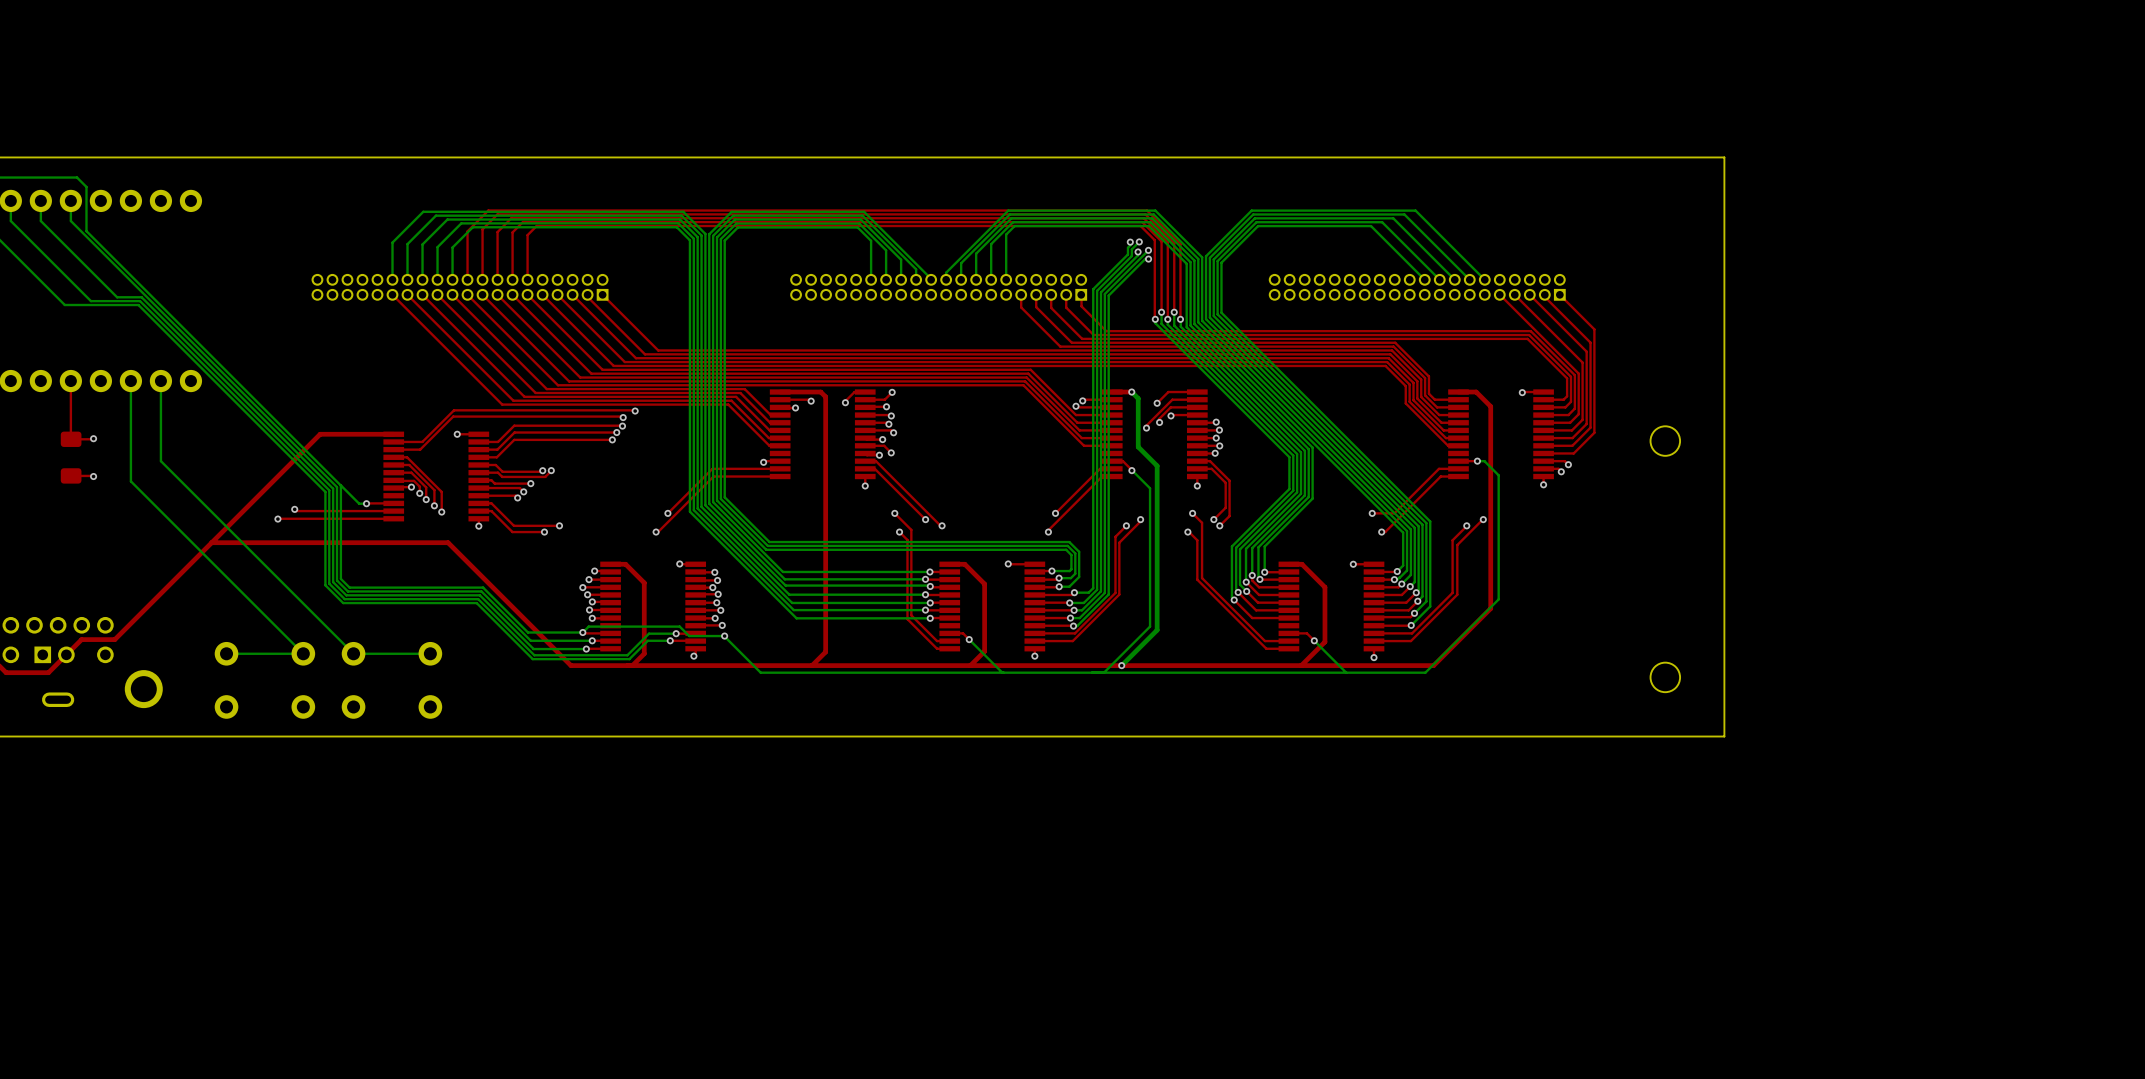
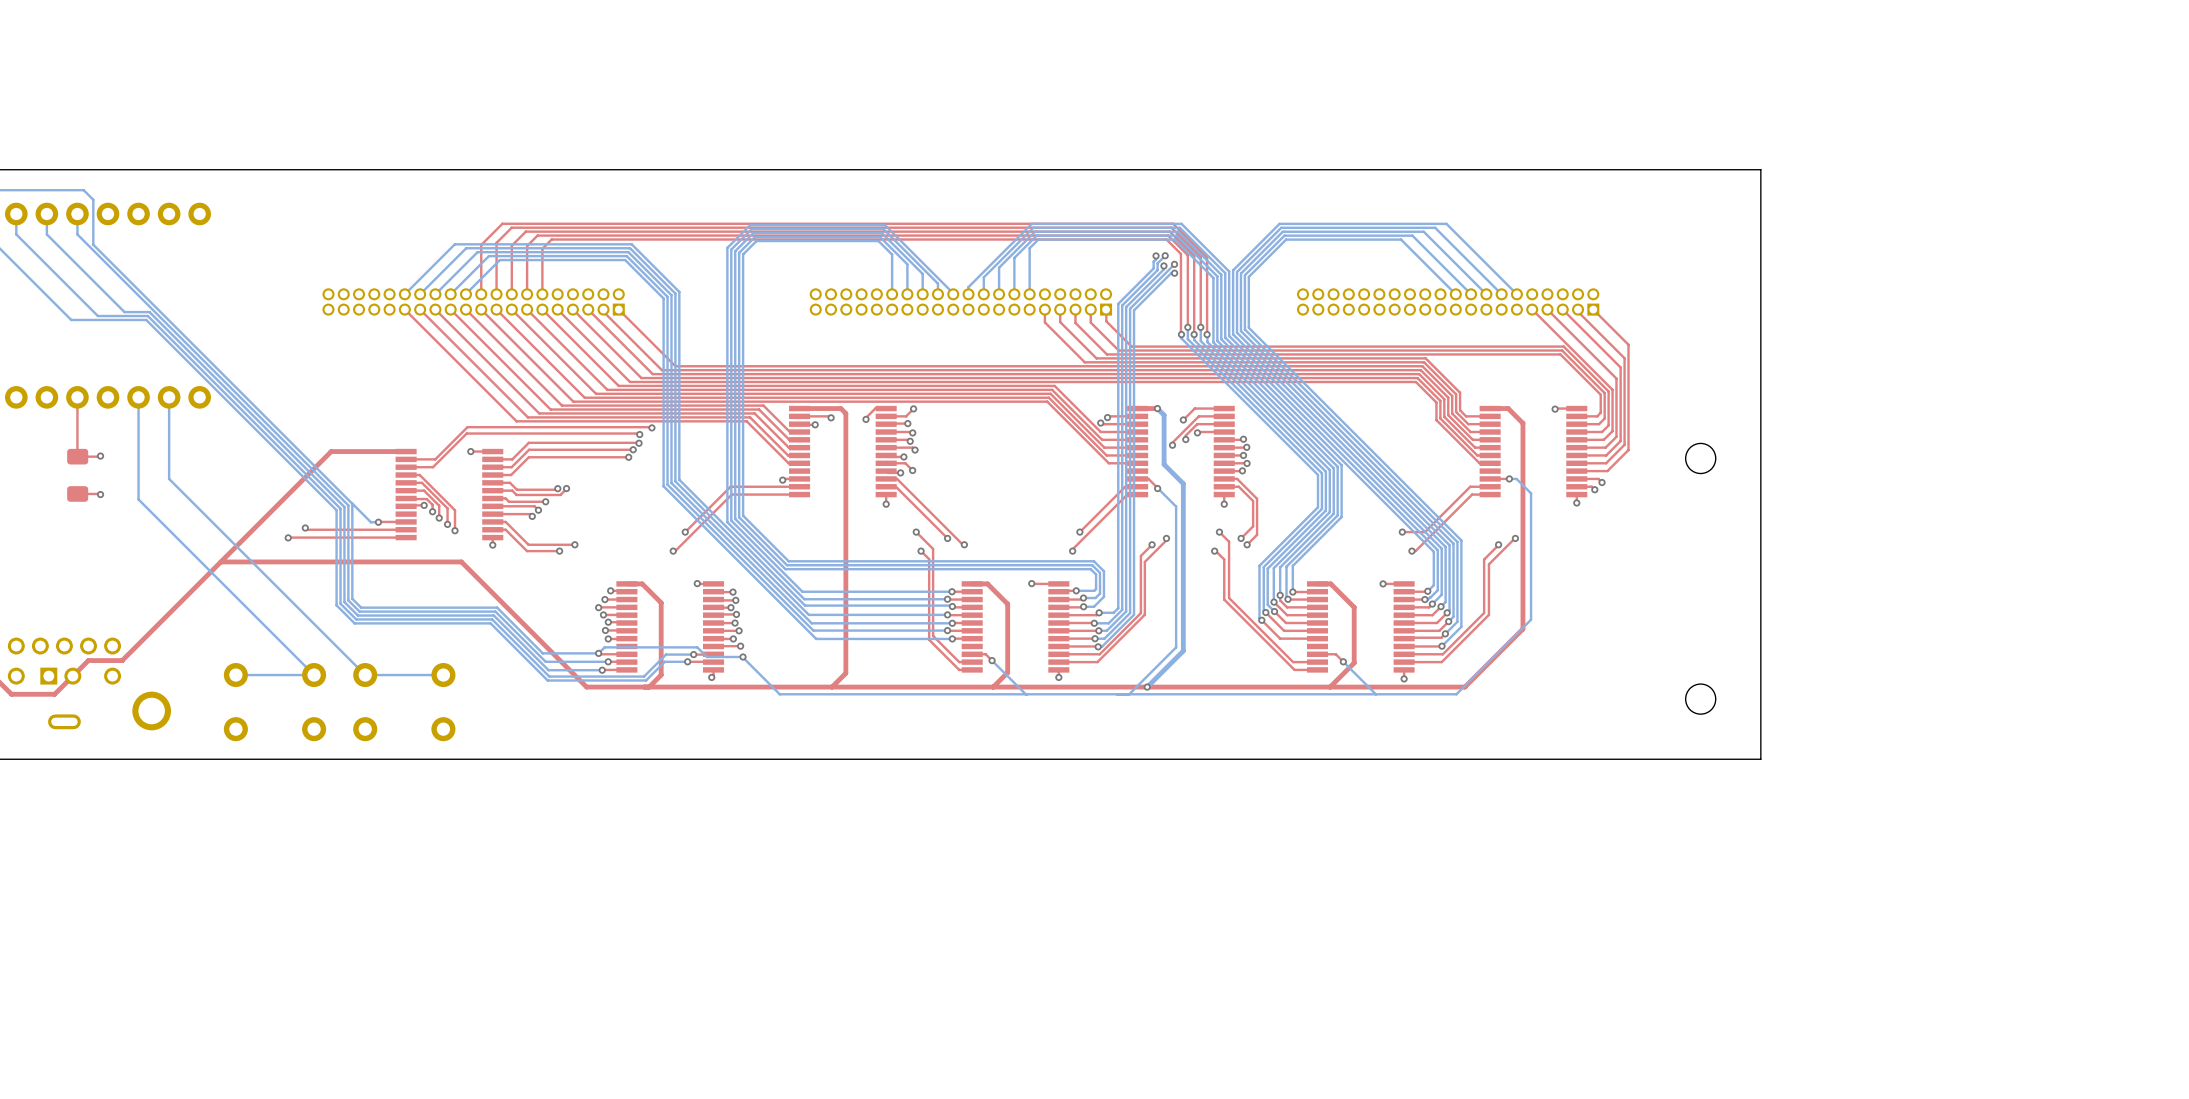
bottom track: (392, 279) (392, 242) (423, 211) (683, 211) (705, 233) (705, 505) -> (404, 294) (454, 244) (631, 244) (679, 291) (679, 479) (723, 523)
bottom track: (407, 279) (407, 244) (435, 215) (681, 215) (701, 235) (701, 506) -> (420, 294) (466, 248) (630, 248) (675, 293) (675, 481) (719, 525)
bottom track: (422, 279) (422, 244) (447, 219) (680, 219) (697, 237) (697, 508) -> (435, 294) (477, 252) (628, 252) (671, 295) (671, 483) (715, 527)
bottom track: (437, 279) (437, 247) (461, 223) (678, 223) (693, 238) (693, 510) -> (450, 294) (488, 256) (626, 256) (667, 296) (667, 484) (711, 528)
bottom track: (452, 279) (452, 247) (472, 227) (676, 227) (689, 240) (689, 511) -> (465, 293) (499, 260) (625, 260) (663, 298) (663, 486) (707, 530)

